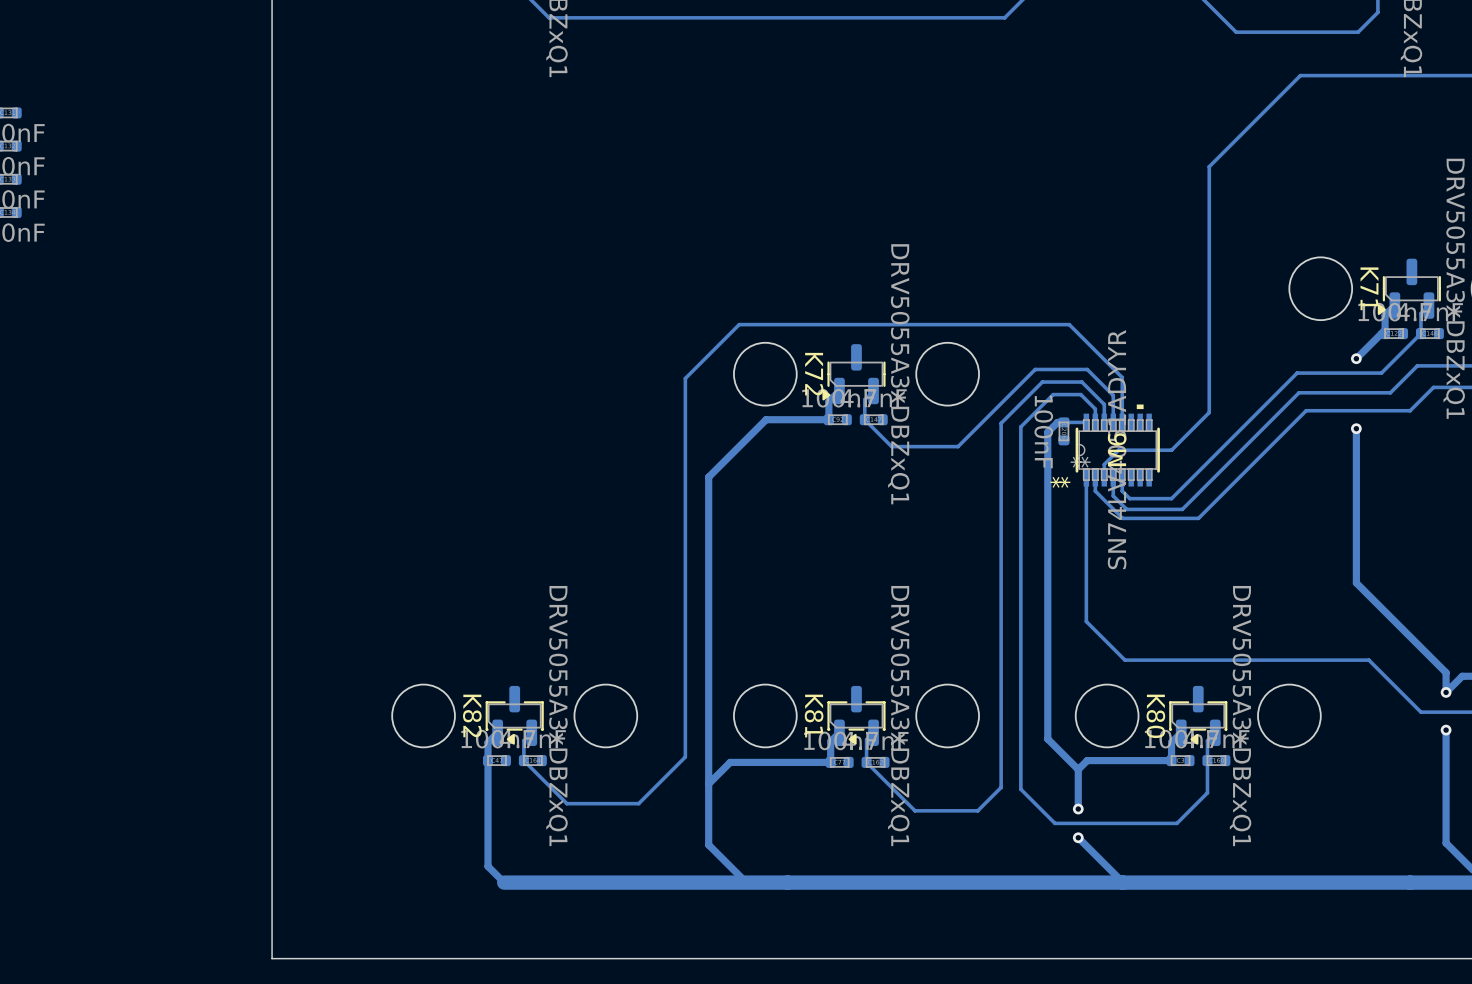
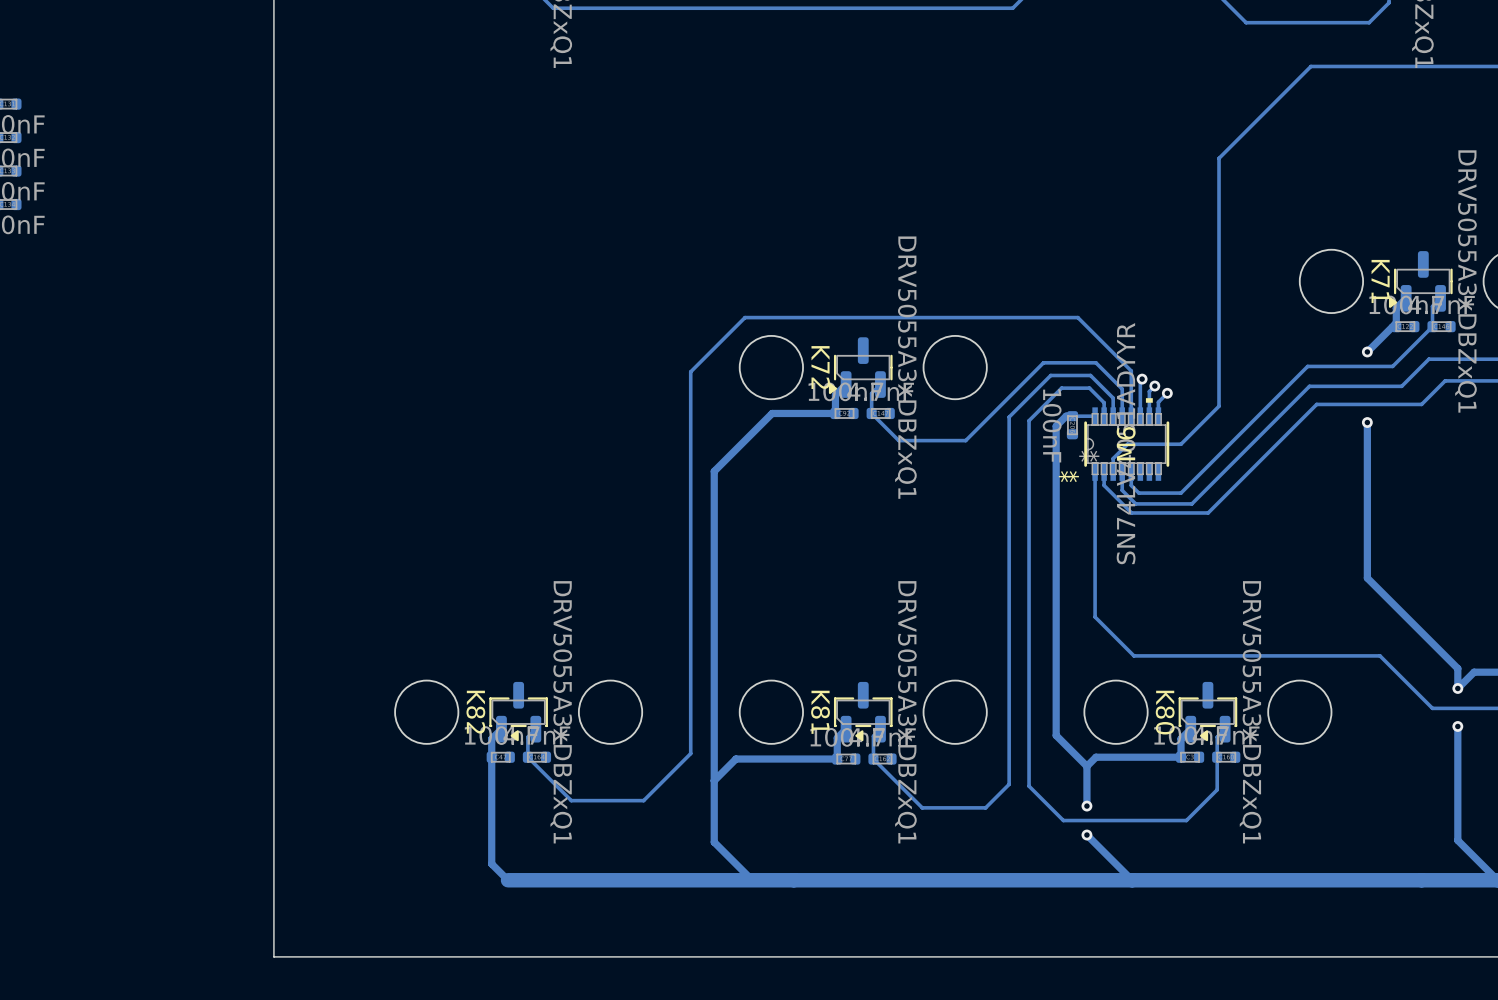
track: none -> (1142, 379) (1140, 380) (1140, 416)
via: none -> (1142, 379)
track: none -> (1154, 386) (1149, 391) (1149, 416)
via: none -> (1154, 386)
track: none -> (1167, 393) (1158, 402) (1158, 416)
via: none -> (1167, 393)

